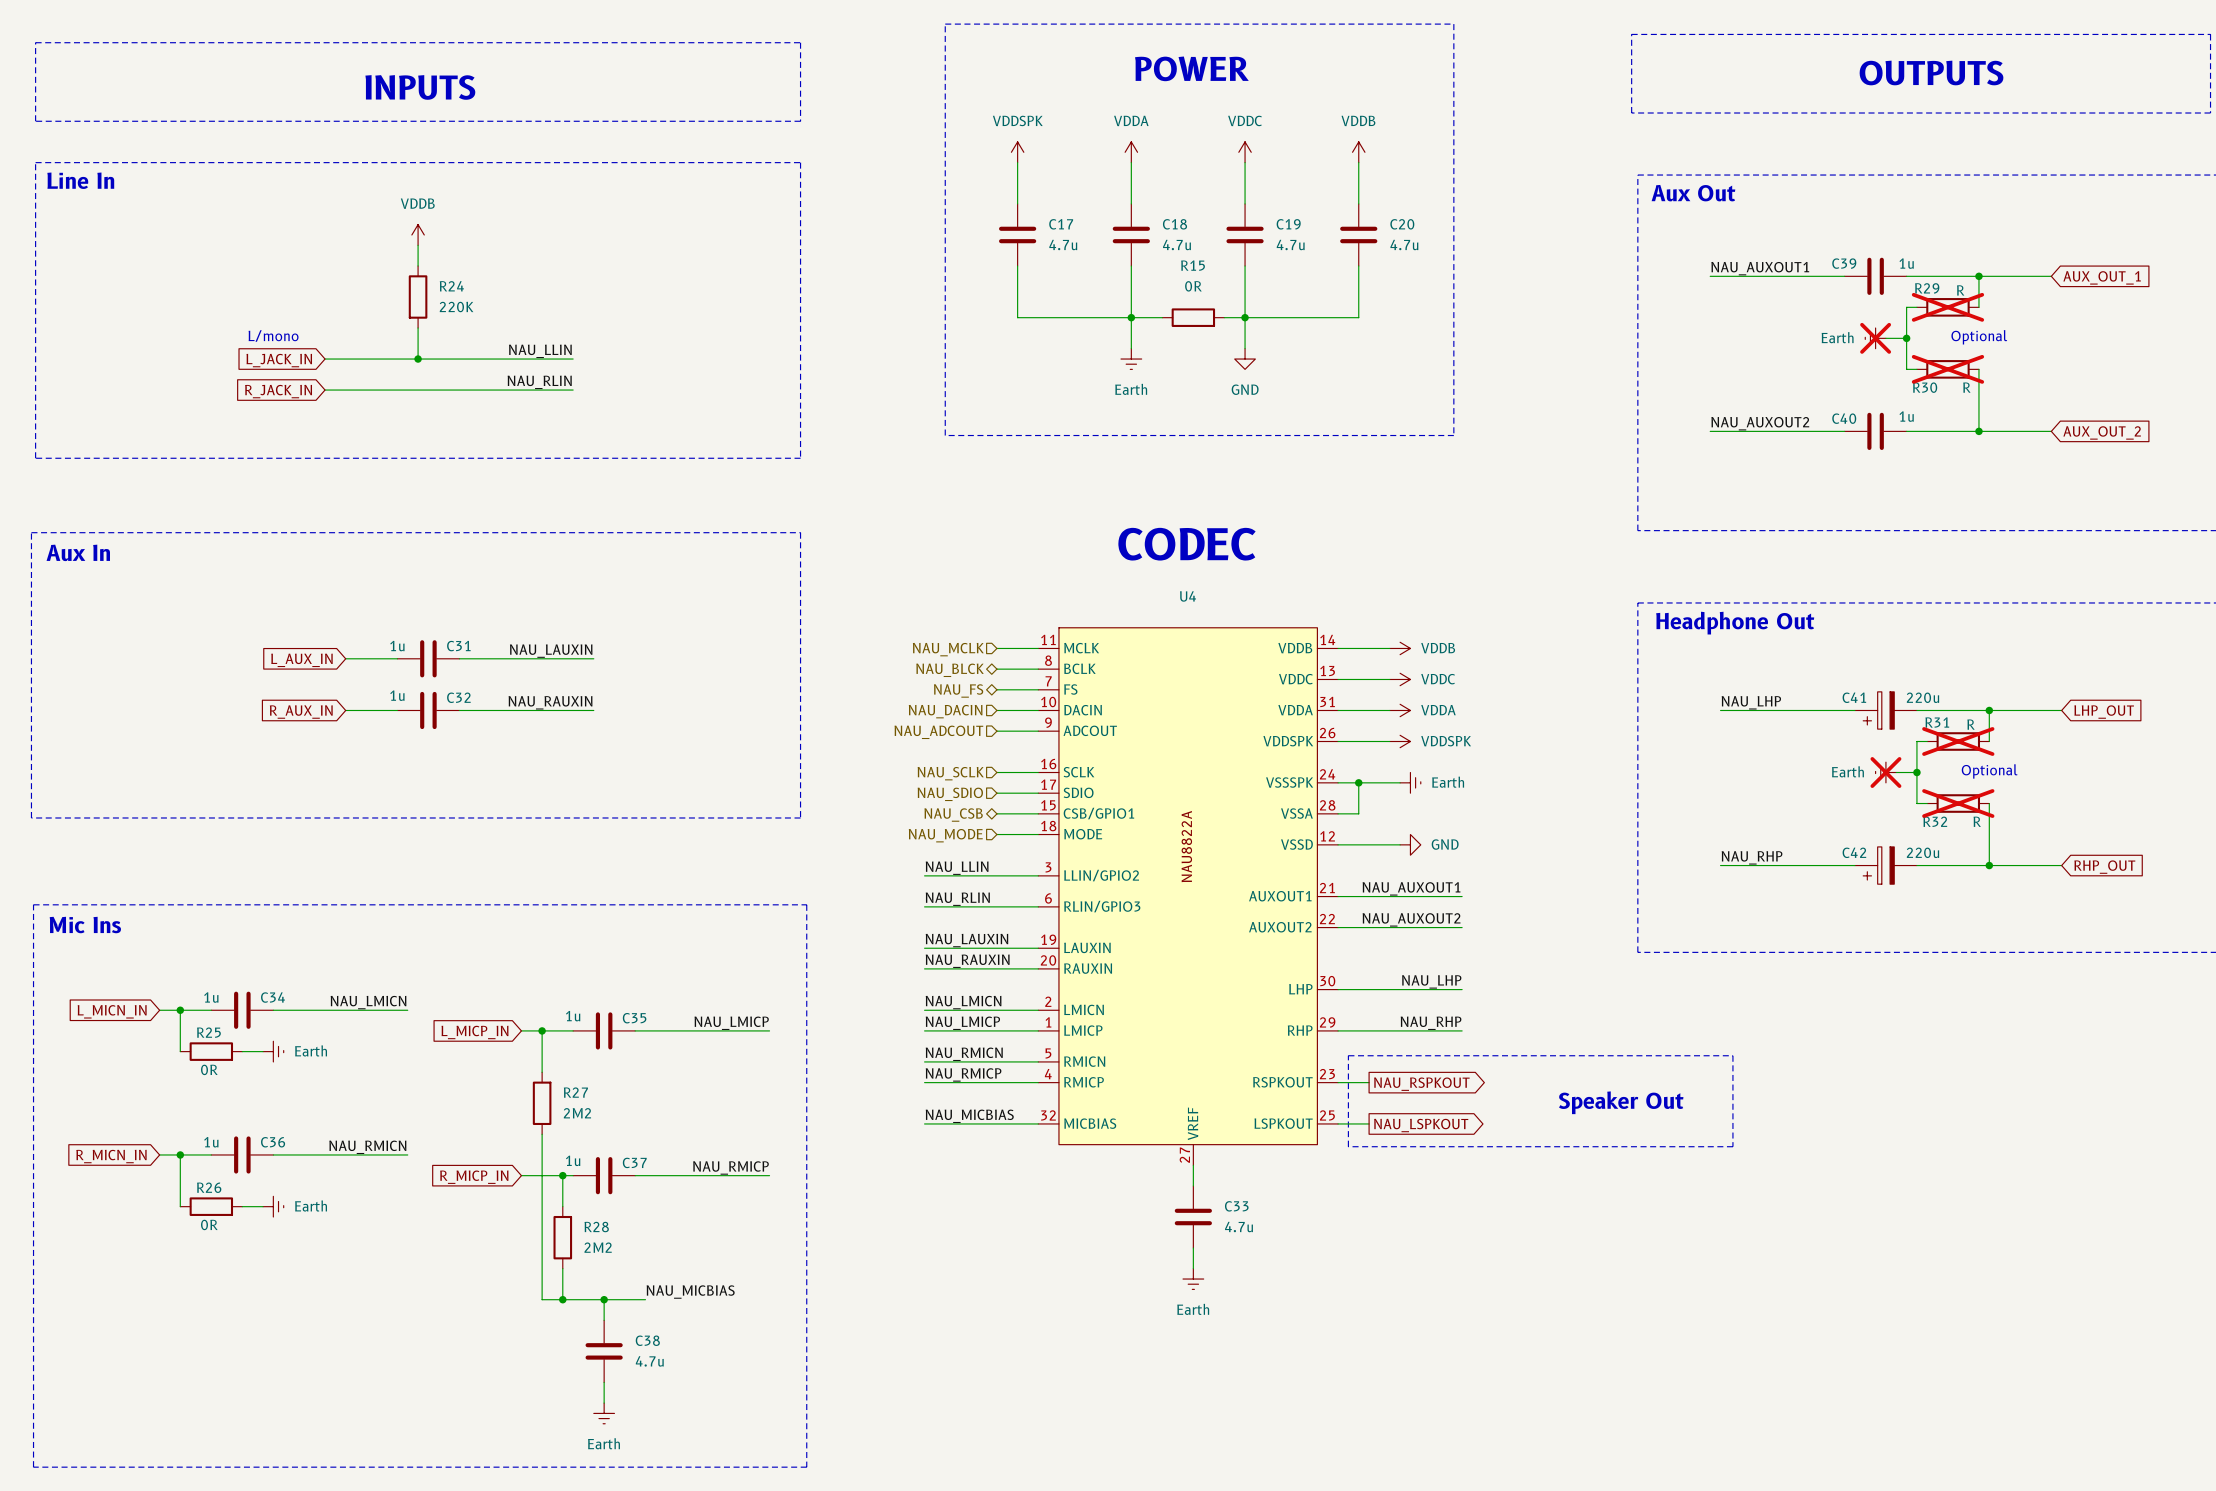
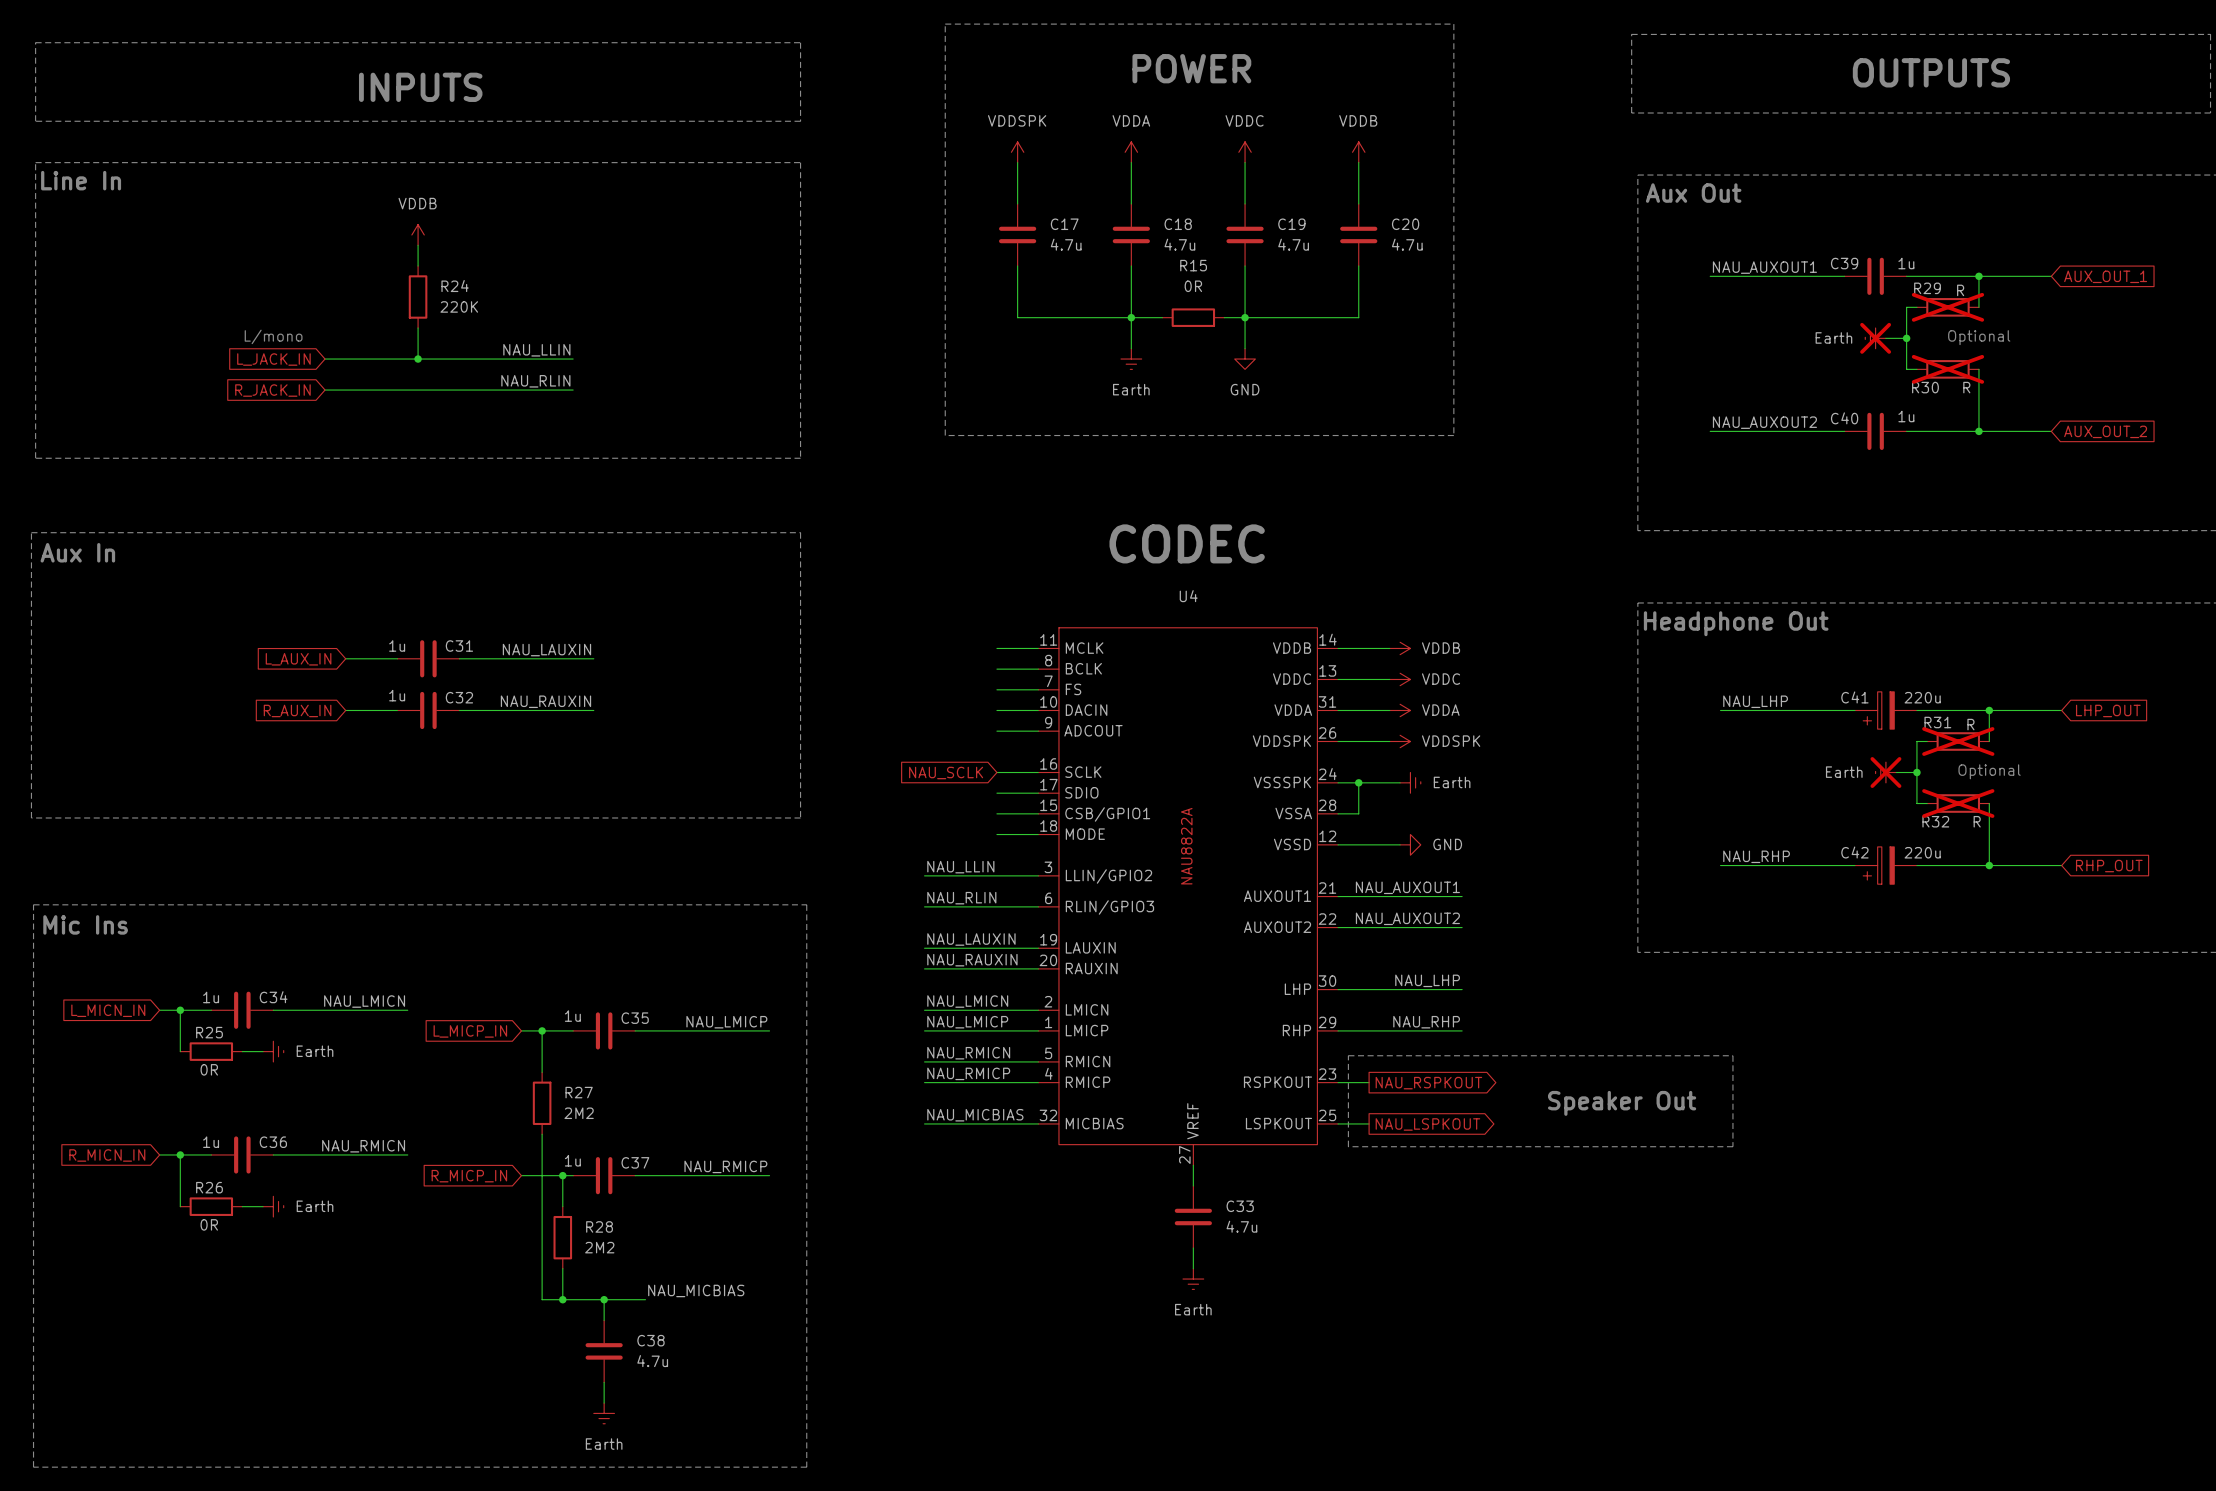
hierarchical label: NAU_MCLK (948, 649) -> none
hierarchical label: NAU_BLCK (950, 670) -> none
hierarchical label: NAU_FS (958, 690) -> none
hierarchical label: NAU_DACIN (945, 711) -> none
hierarchical label: NAU_ADCOUT (938, 732) -> none
hierarchical label: NAU_SCLK (950, 773) -> none
global label: none -> NAU_SCLK (946, 773)
hierarchical label: NAU_SDIO (950, 794) -> none
hierarchical label: NAU_CSB (953, 815) -> none
hierarchical label: NAU_MODE (945, 835) -> none

